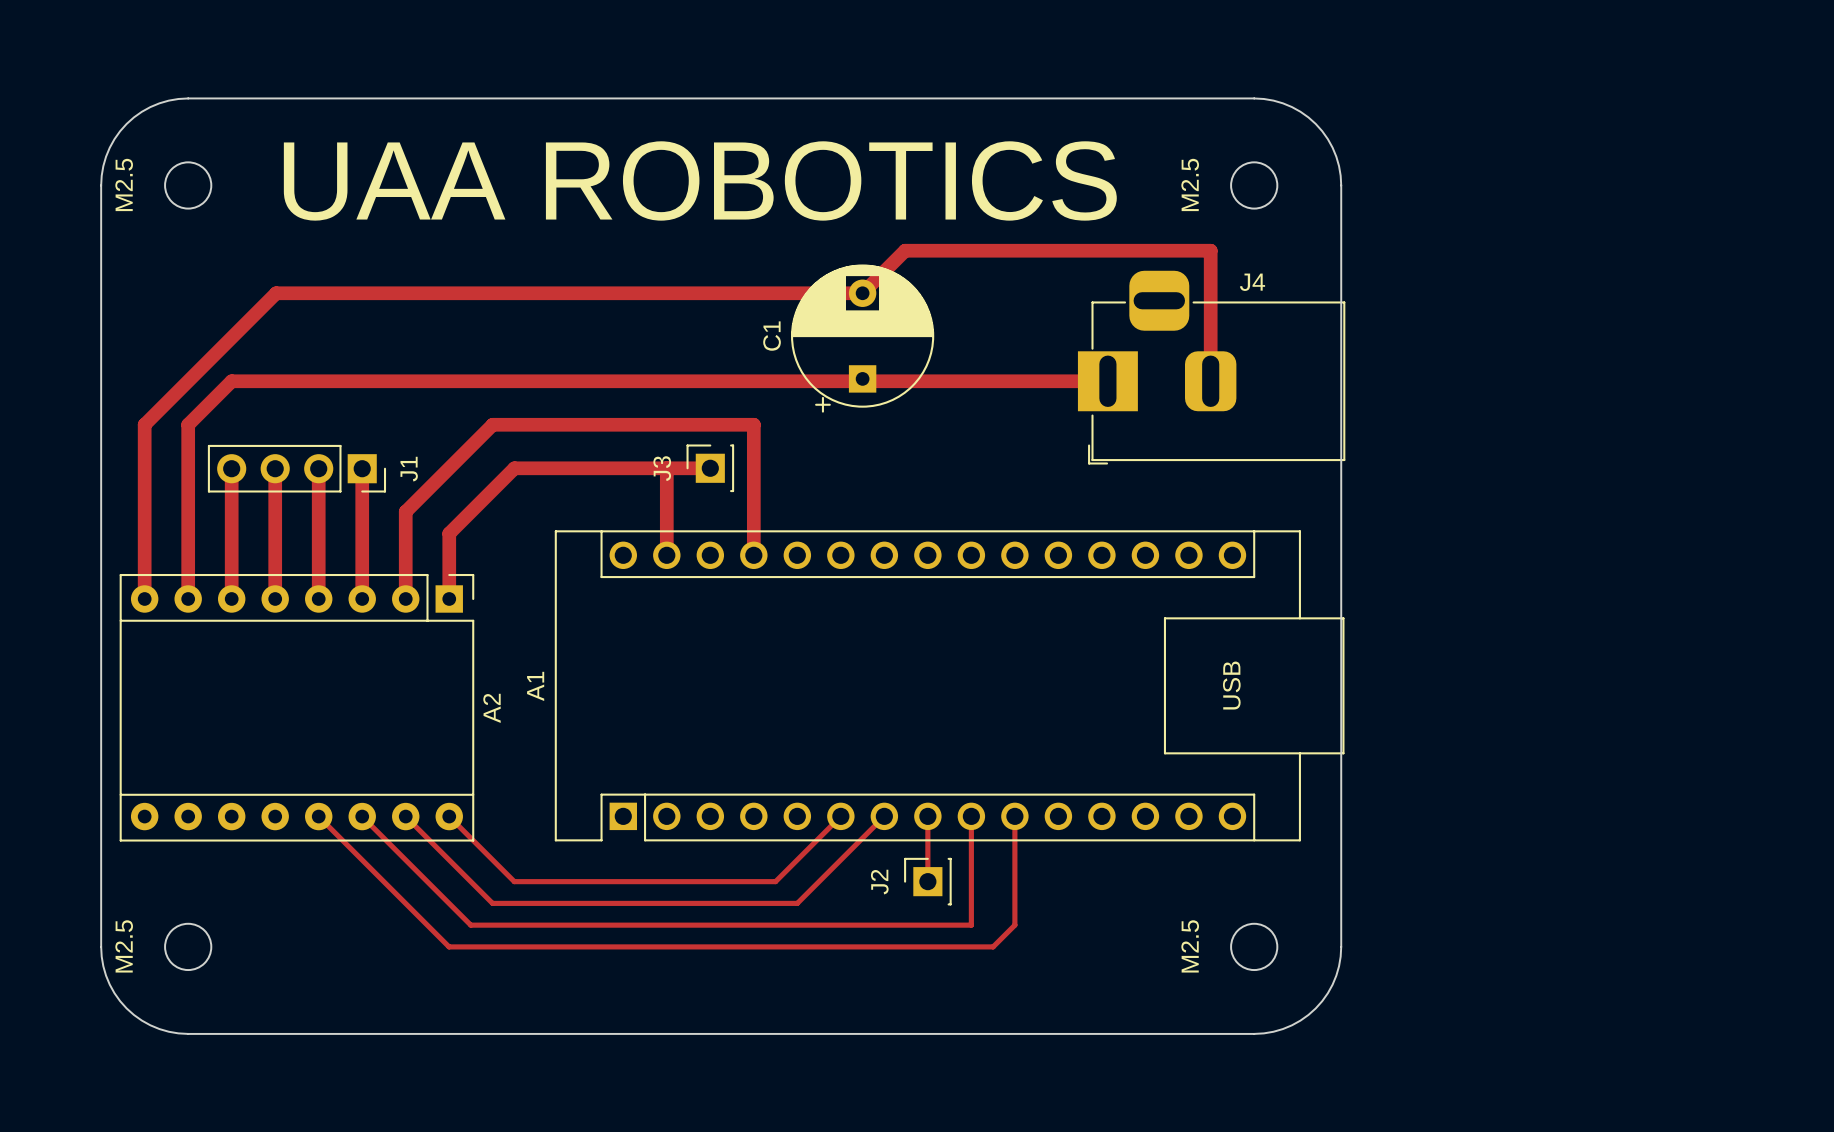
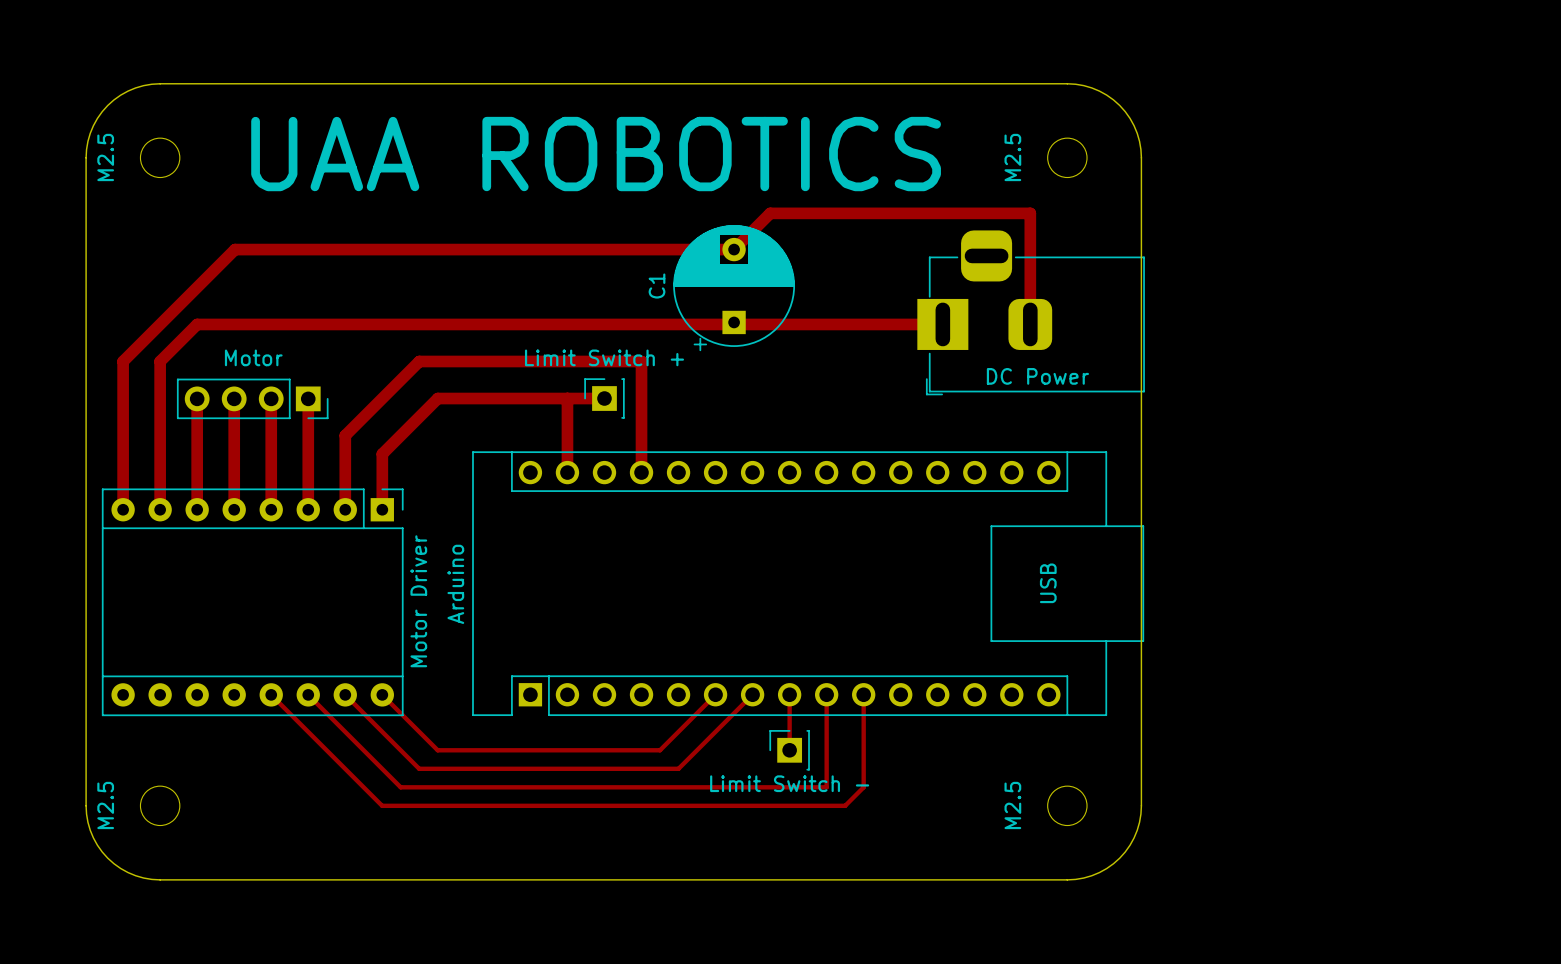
J4 name: J4 (1252, 282) -> DC Power (1037, 376)
J3 name: J3 (662, 468) -> Limit Switch + (604, 357)
J1 name: J1 (409, 469) -> Motor (253, 357)
A1 name: A1 (535, 686) -> Arduino (455, 584)
A2 name: A2 (491, 708) -> Motor Driver (418, 601)
J2 name: J2 (879, 882) -> Limit Switch - (789, 783)

